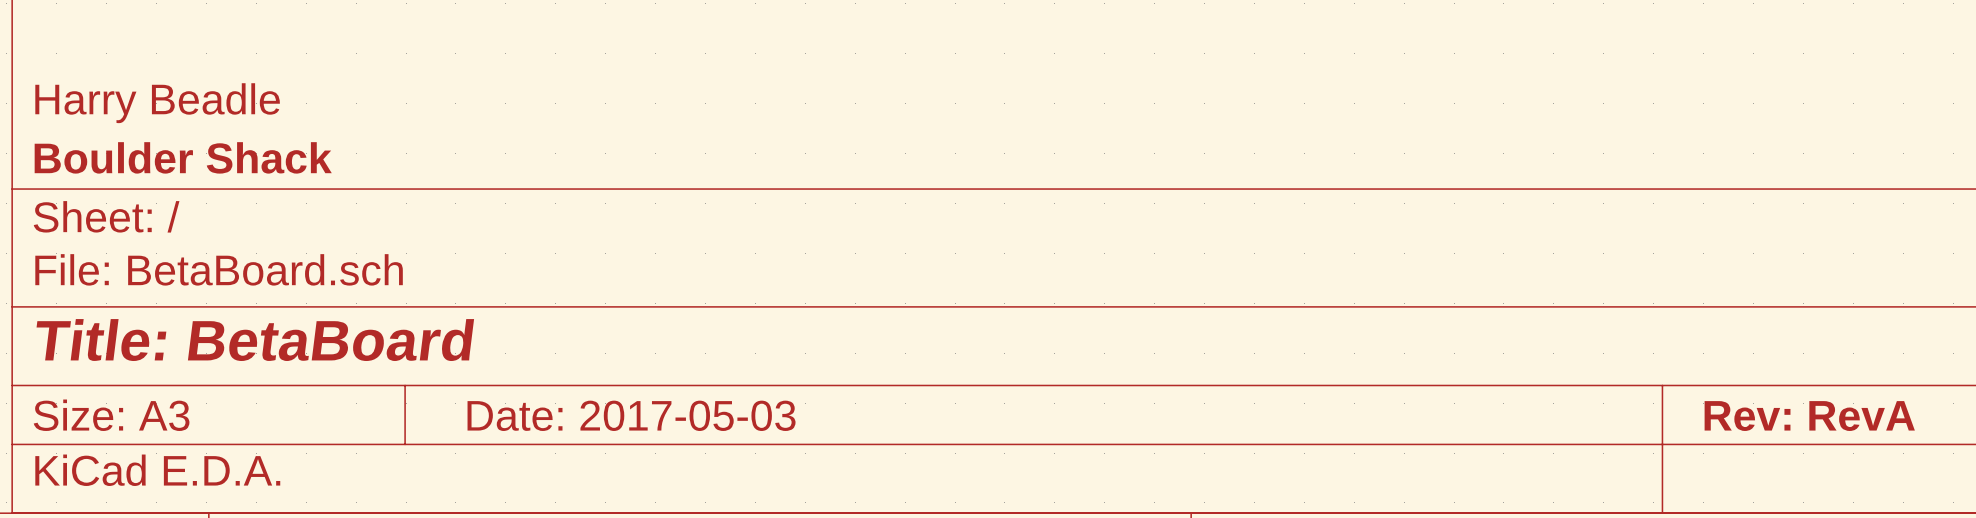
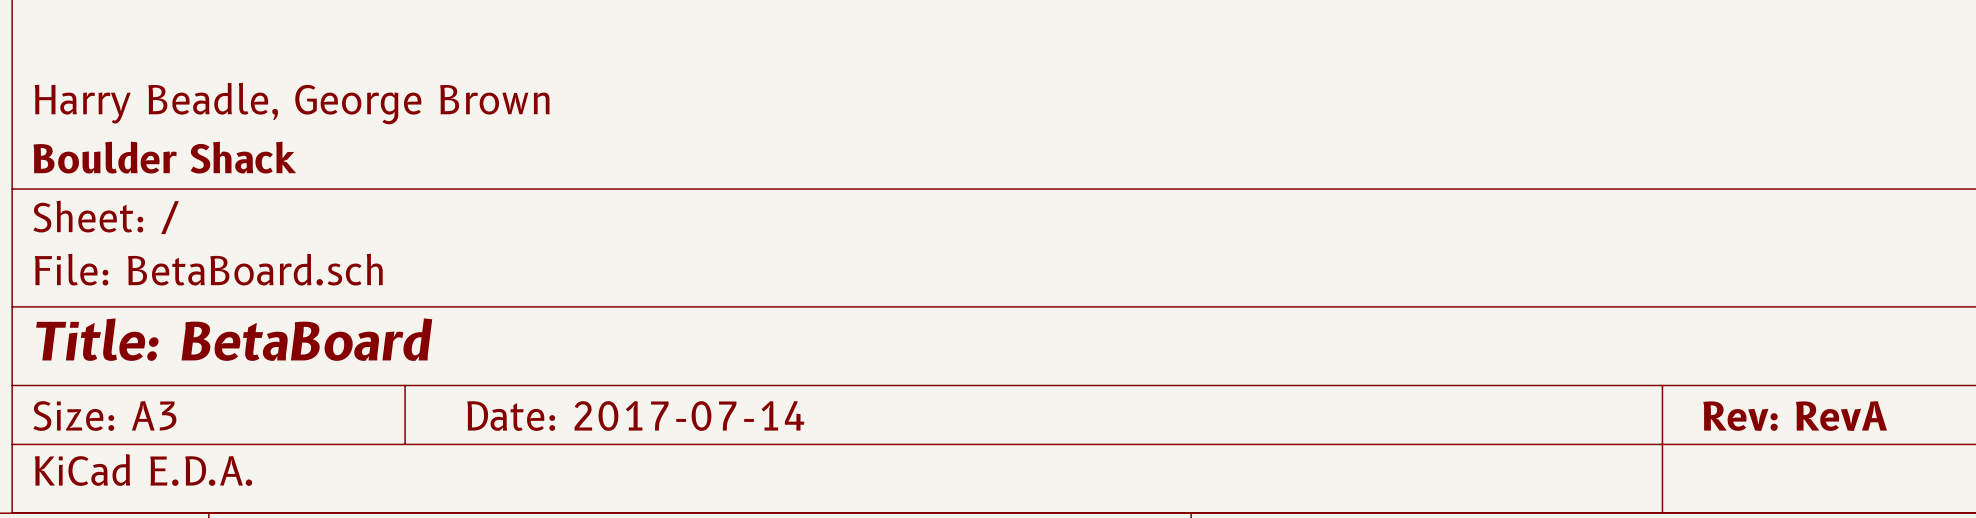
title block: Harry Beadle (157, 103) -> Harry Beadle, George Brown (292, 103)
title block: Date: 2017-05-03 (631, 415) -> Date: 2017-07-14 (635, 415)

